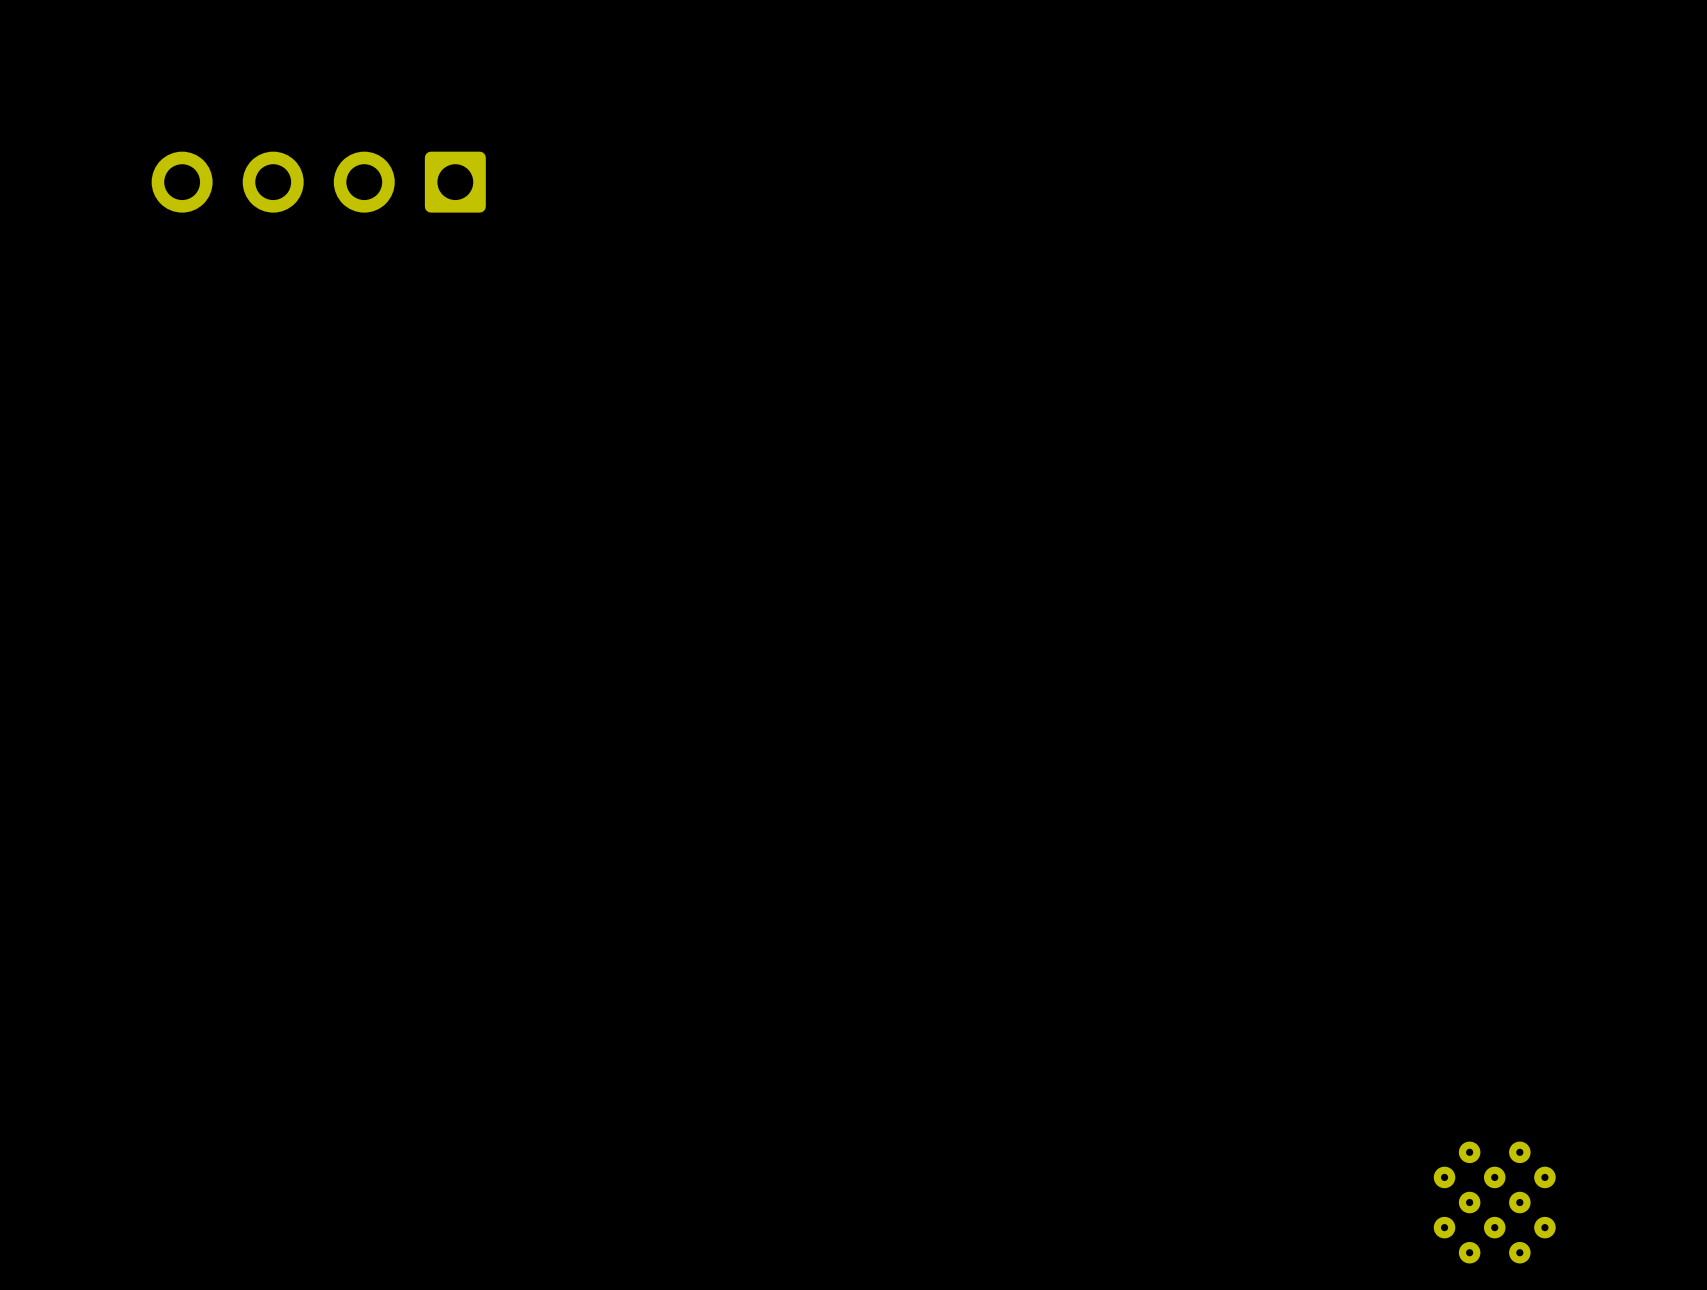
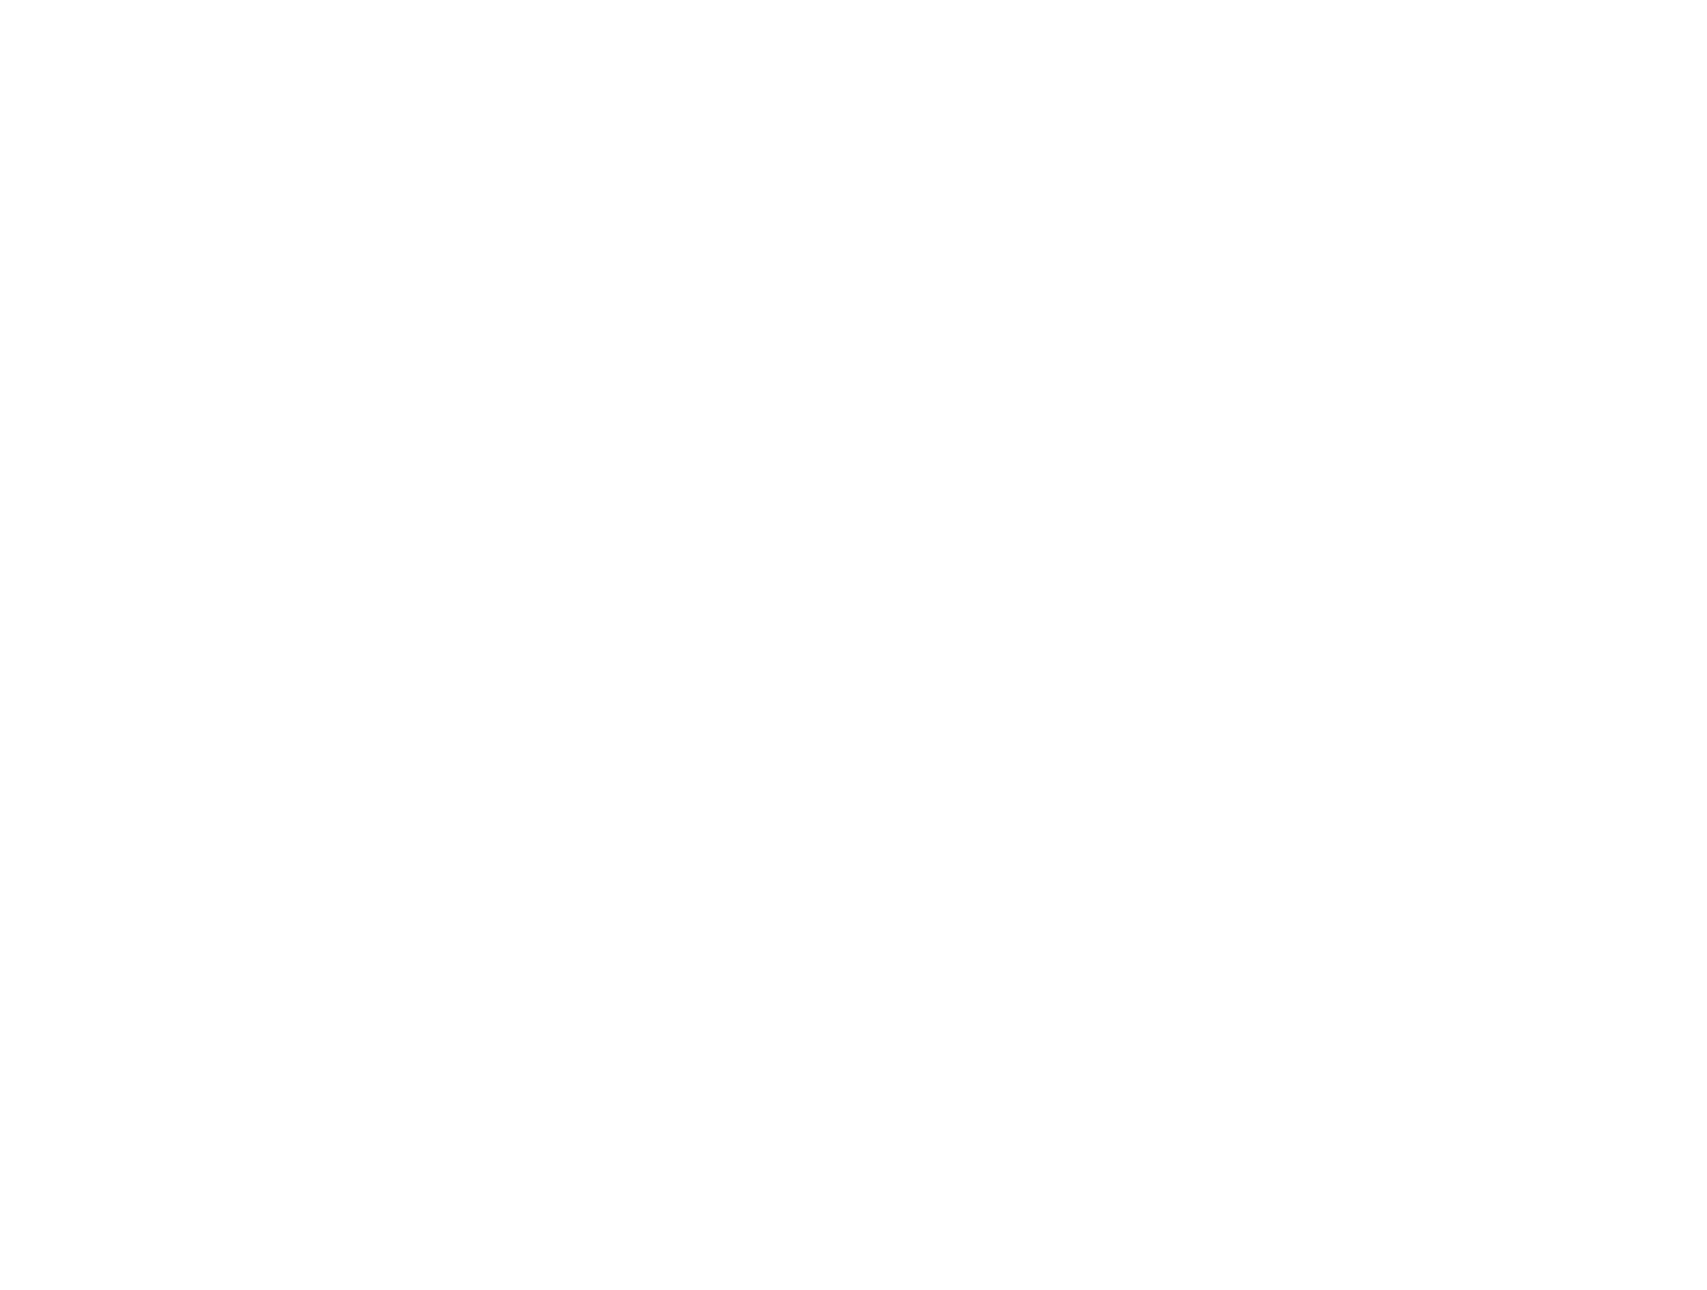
part: (318, 182) -> none
part: (1494, 1202) -> none

